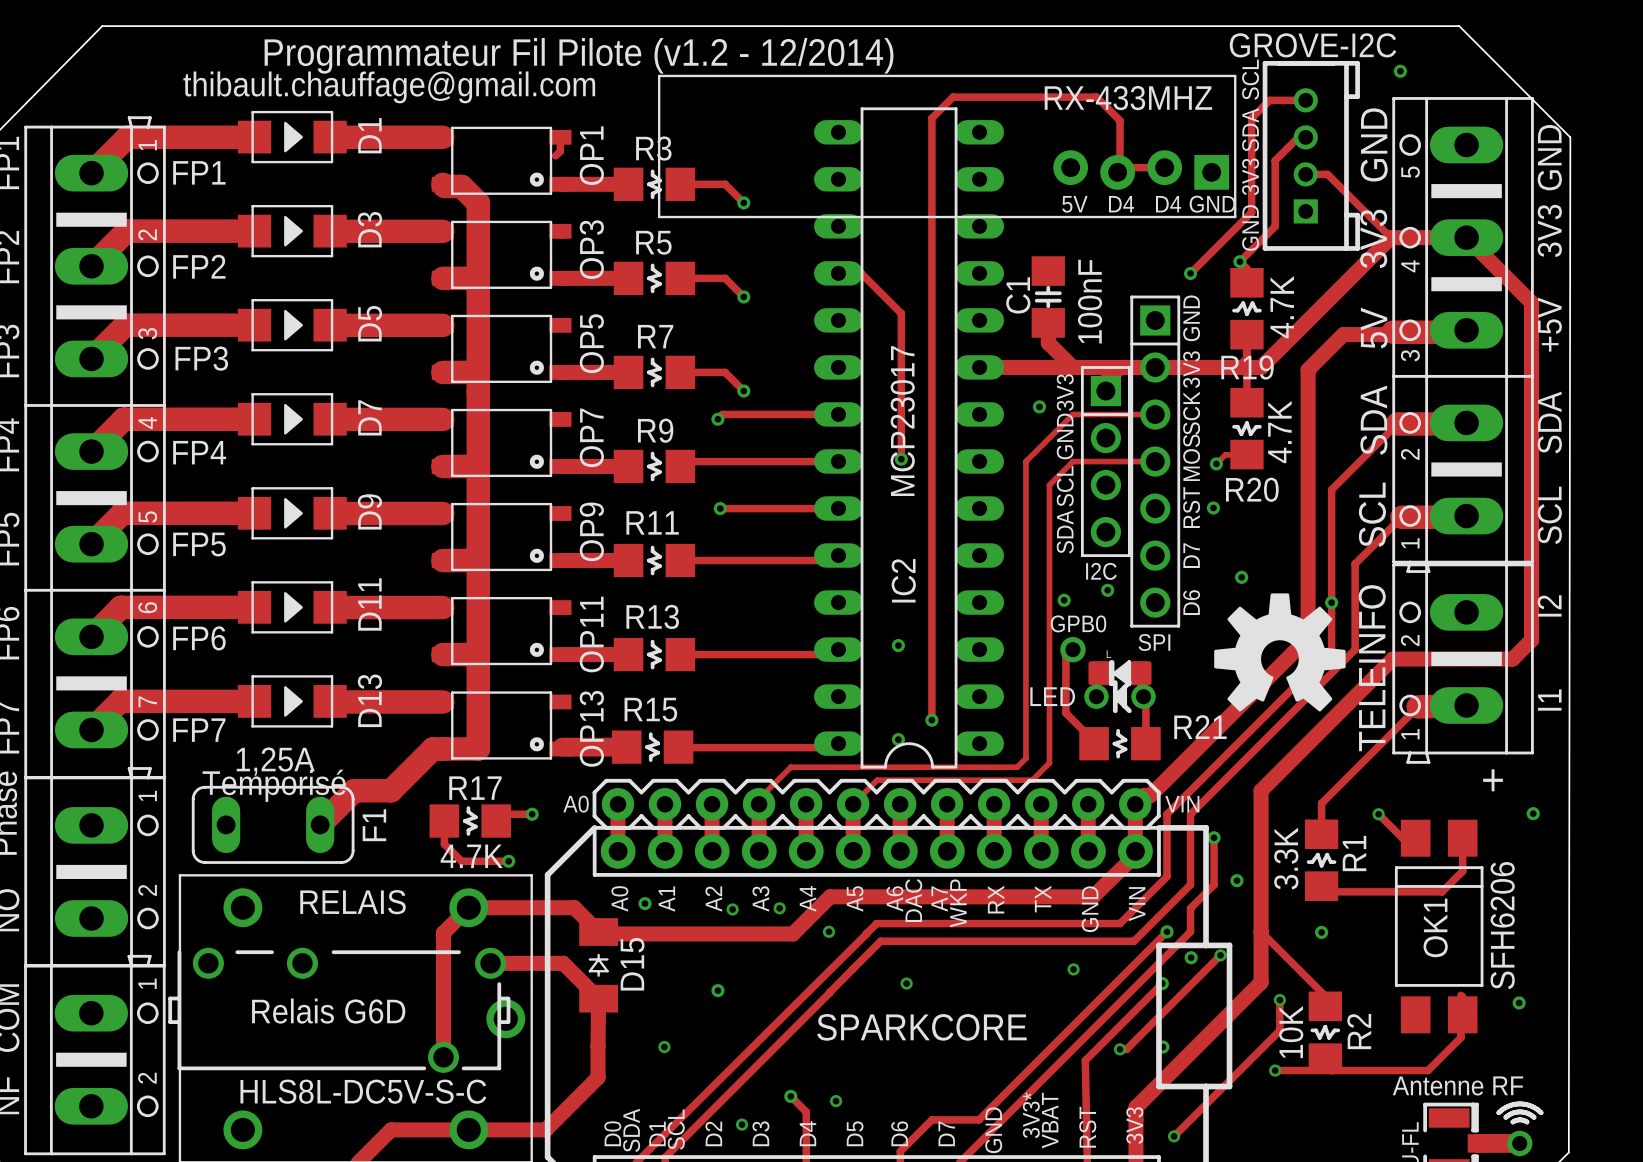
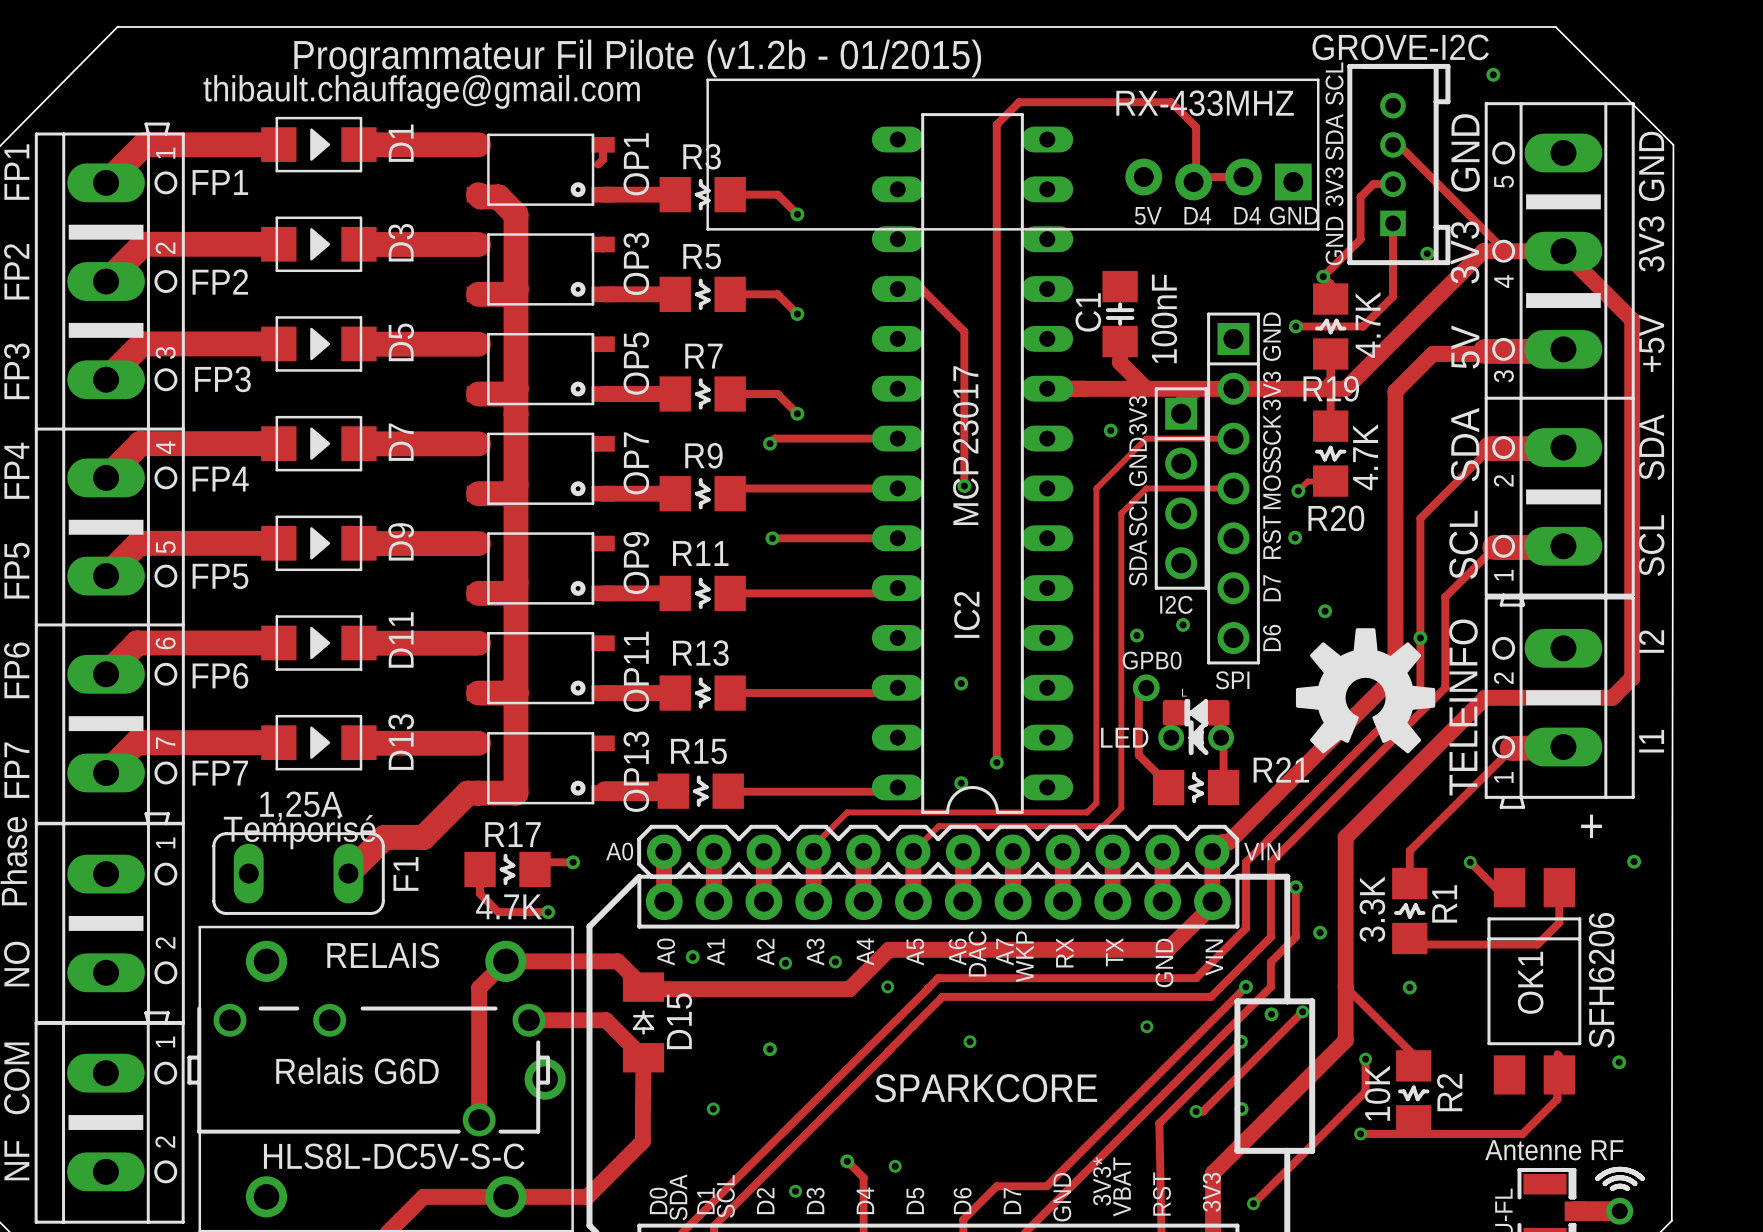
text: Programmateur Fil Pilote (v1.2 - 12/2014) (579, 55) -> Programmateur Fil Pilote (v1.2b - 01/2015) (637, 58)
track: (1305, 100) (1269, 100) (1251, 118) (1251, 212) (1190, 273) -> none
track: (1305, 137) (1298, 137) (1275, 160) (1275, 186) -> (1392, 184) (1373, 184) (1360, 196)
track: none -> (1392, 144) (1398, 144) (1505, 251)
track: (1305, 174) (1327, 174) (1390, 237) -> none
track: none -> (1392, 223) (1392, 296) (1363, 326) (1295, 326)
via: none -> (1427, 253)
via position: (1190, 273) -> (1295, 326)

